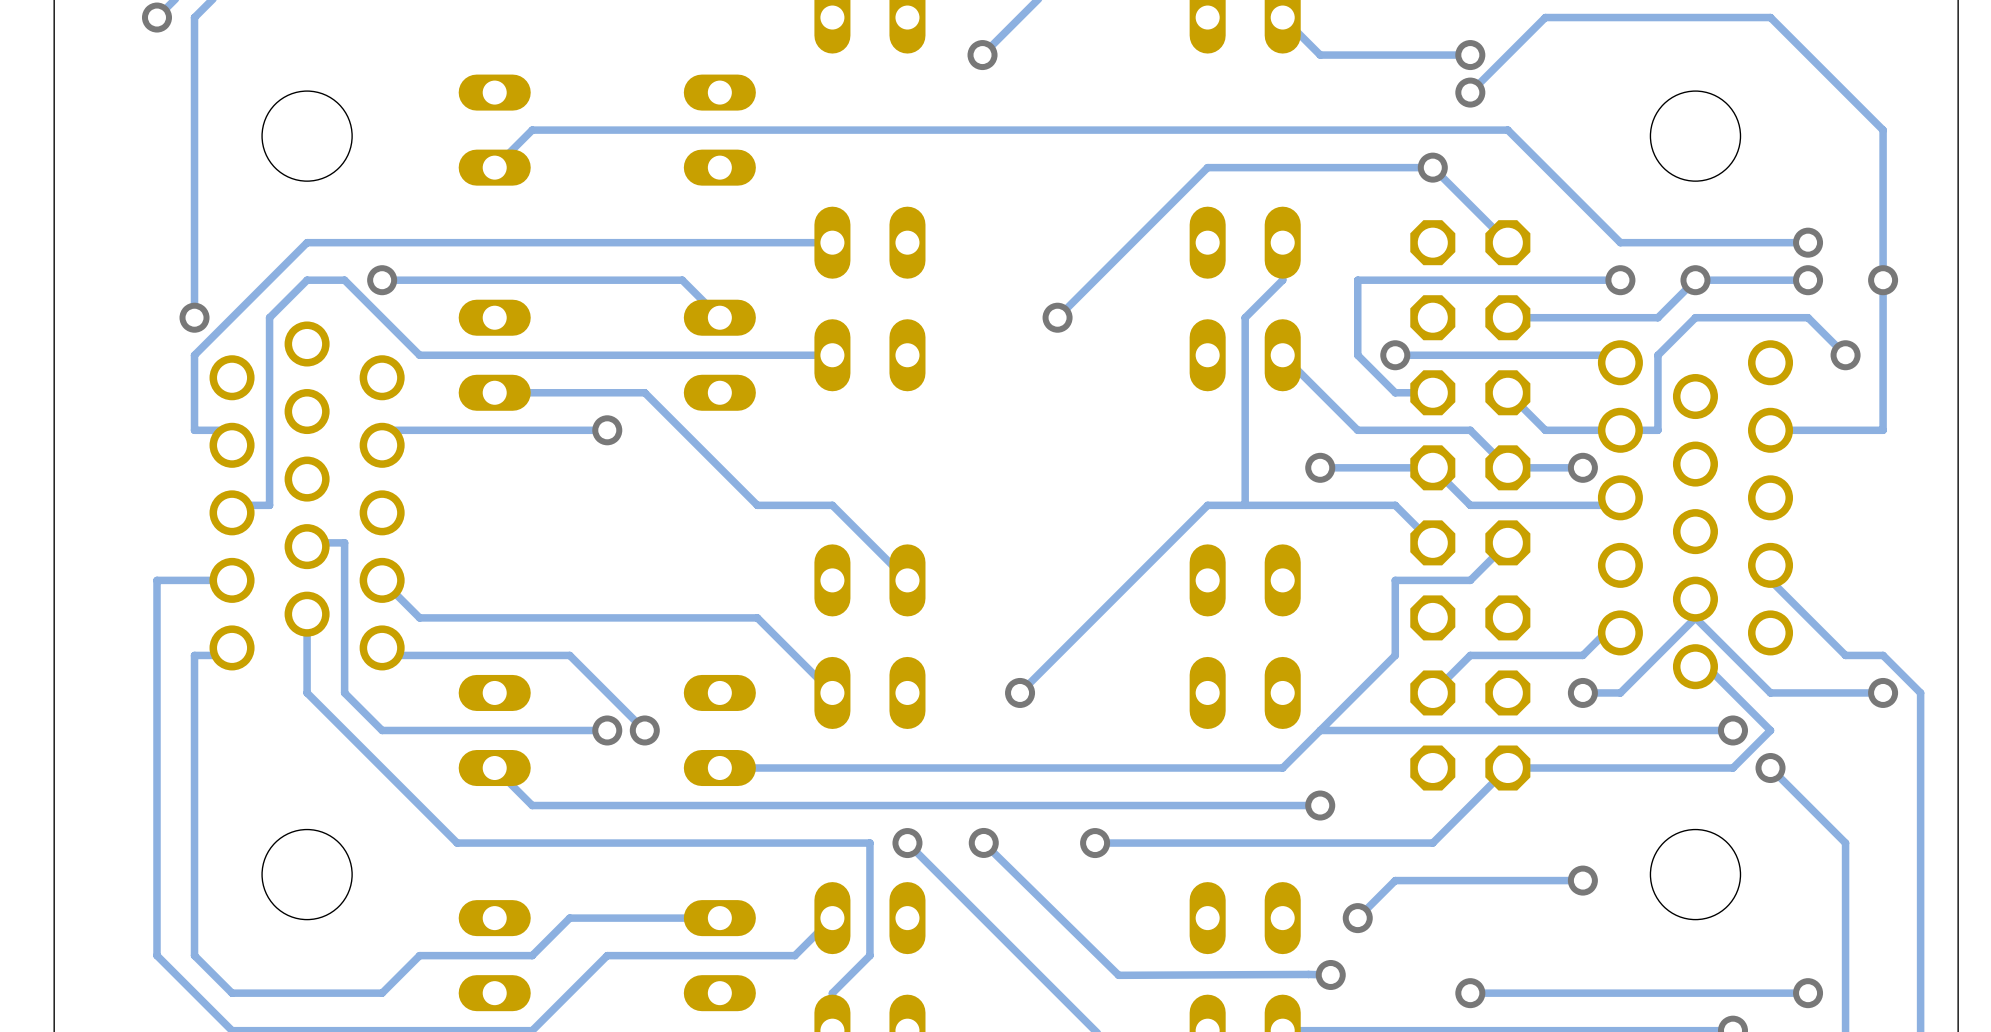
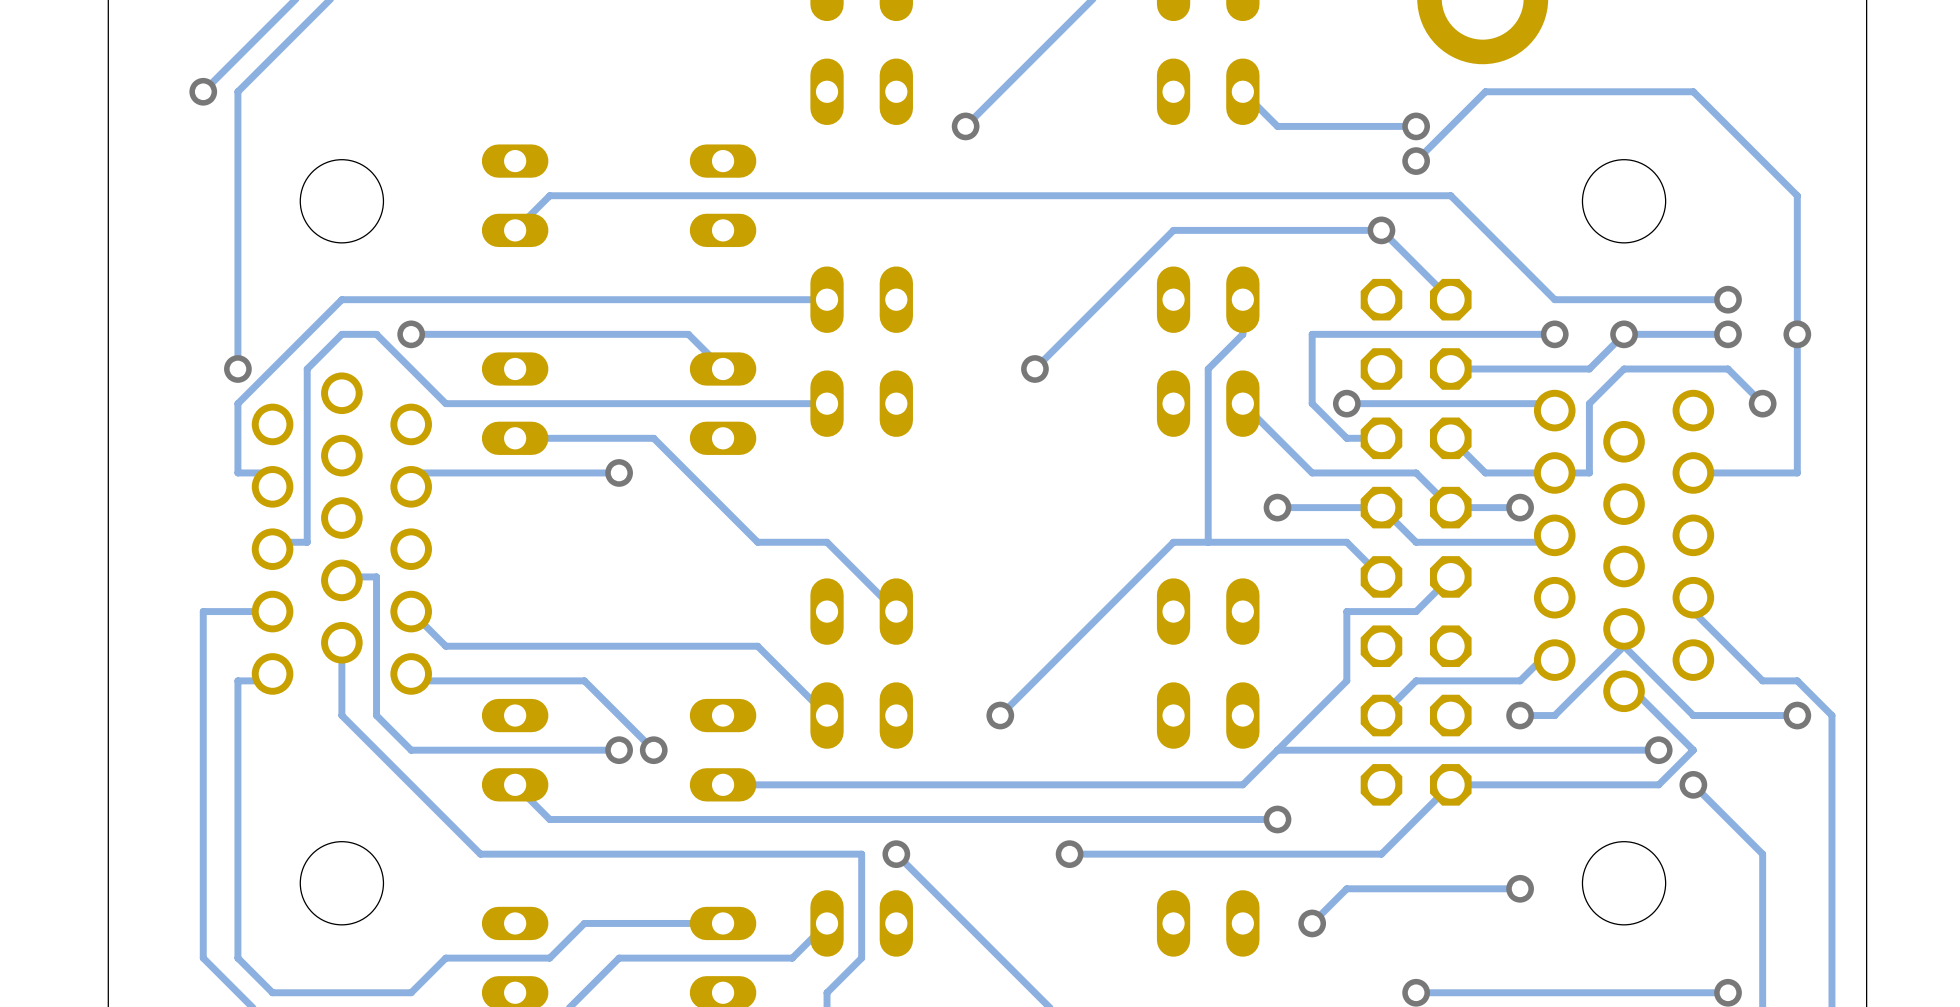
track: (983, 842) (1118, 975) (1330, 974) -> none
via: (983, 842) -> none
via: (1330, 974) -> none

